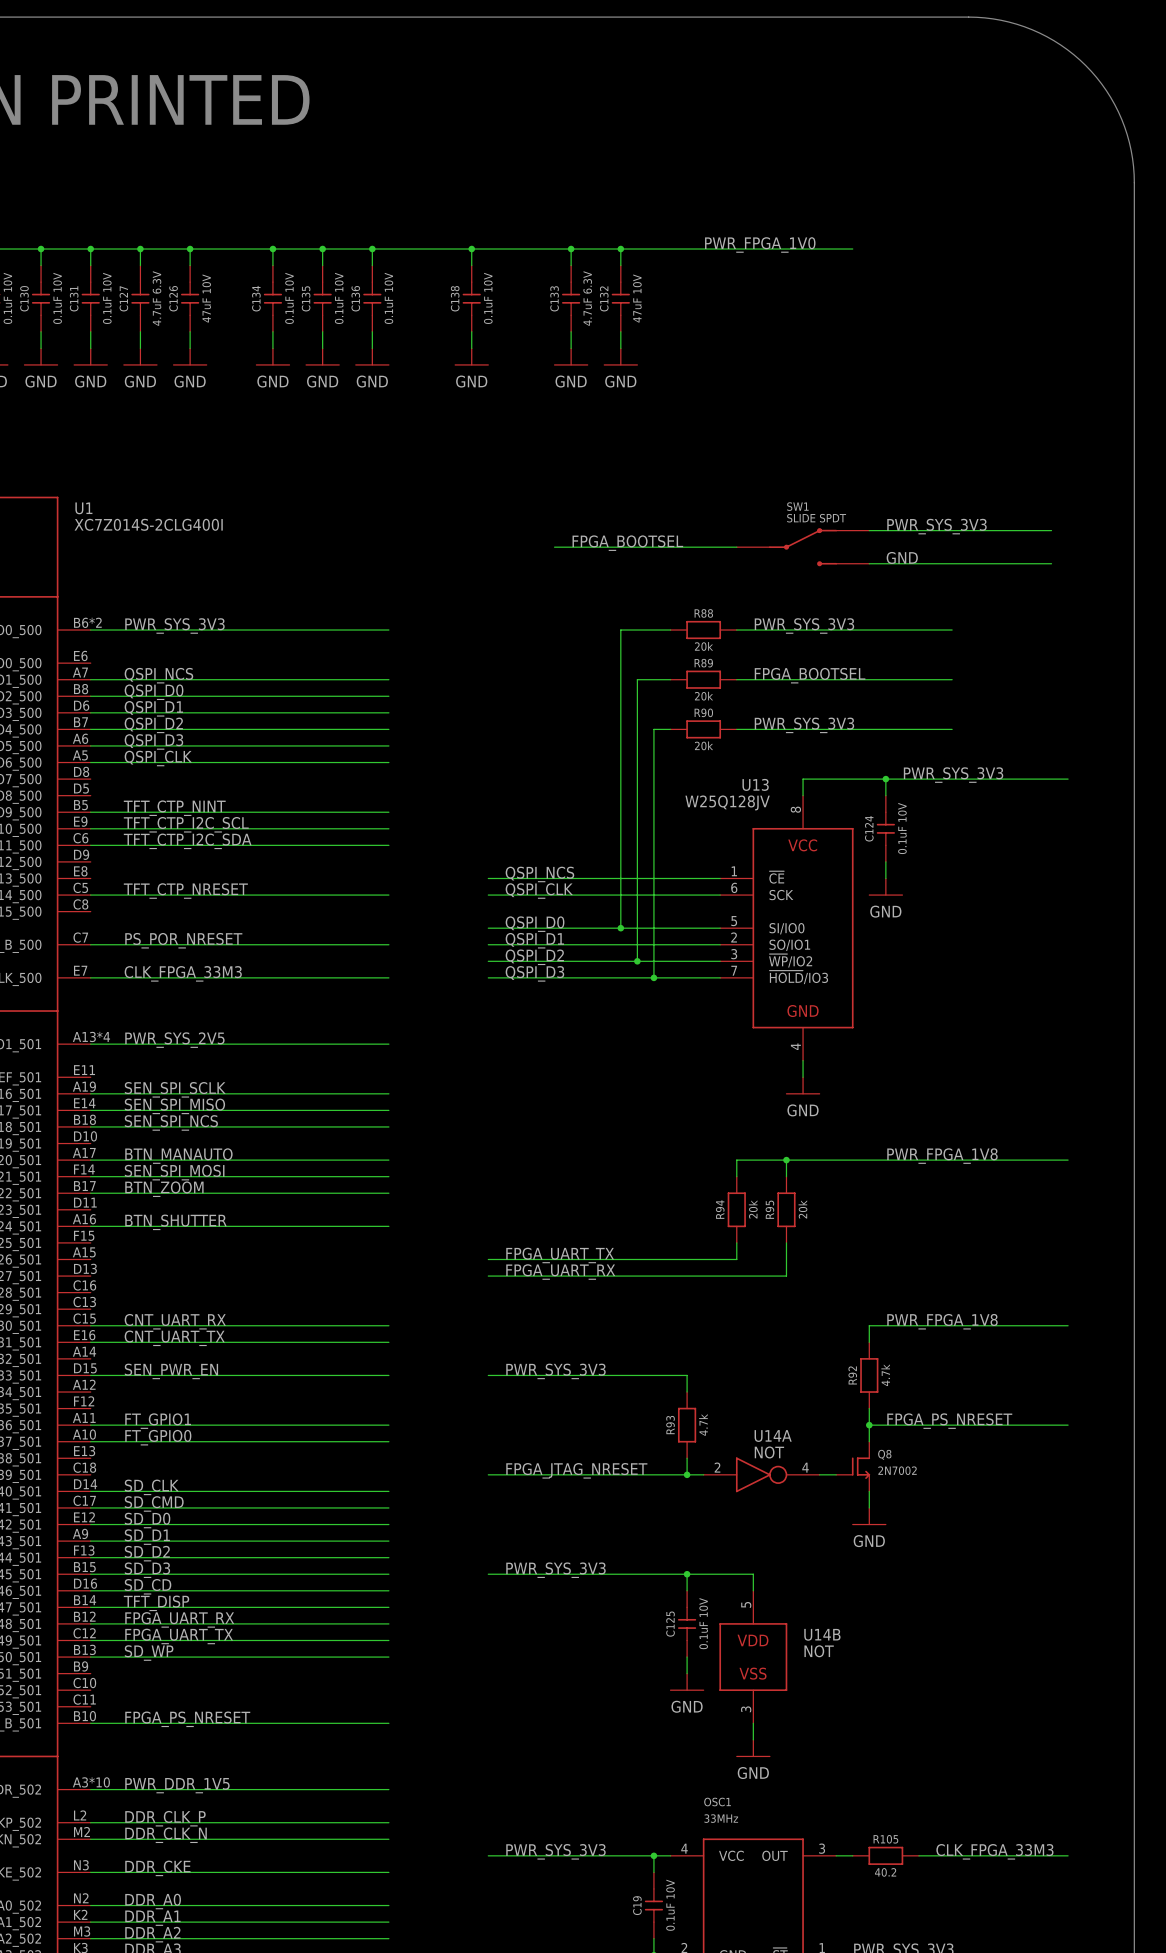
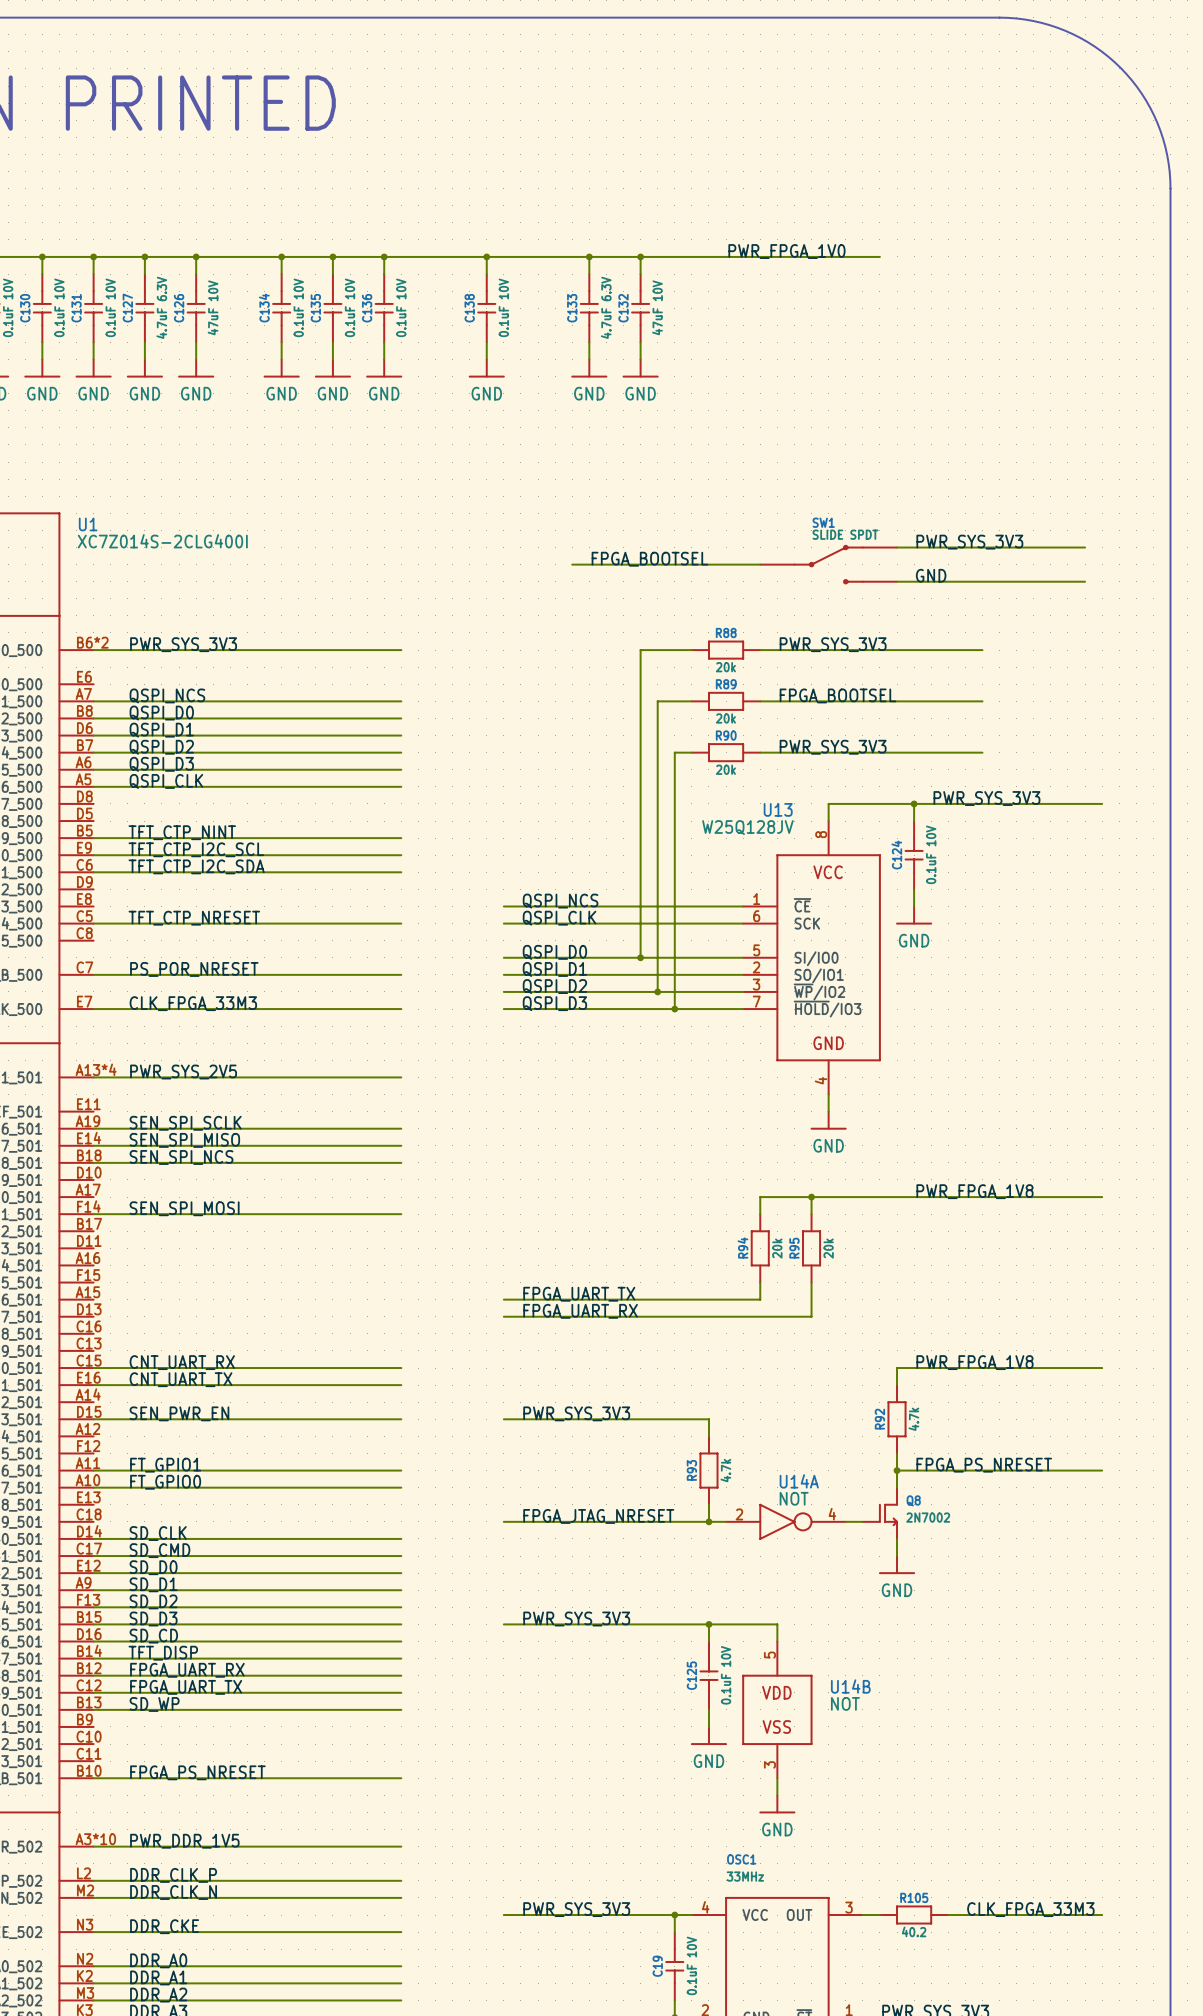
label: BTN_MANAUTO (178, 1156) -> none
wire: (90, 1160) (388, 1160) -> none
label: BTN_ZOOM (164, 1189) -> none
wire: (90, 1193) (388, 1193) -> none
label: BTN_SHUTTER (175, 1222) -> none
wire: (90, 1226) (388, 1226) -> none

